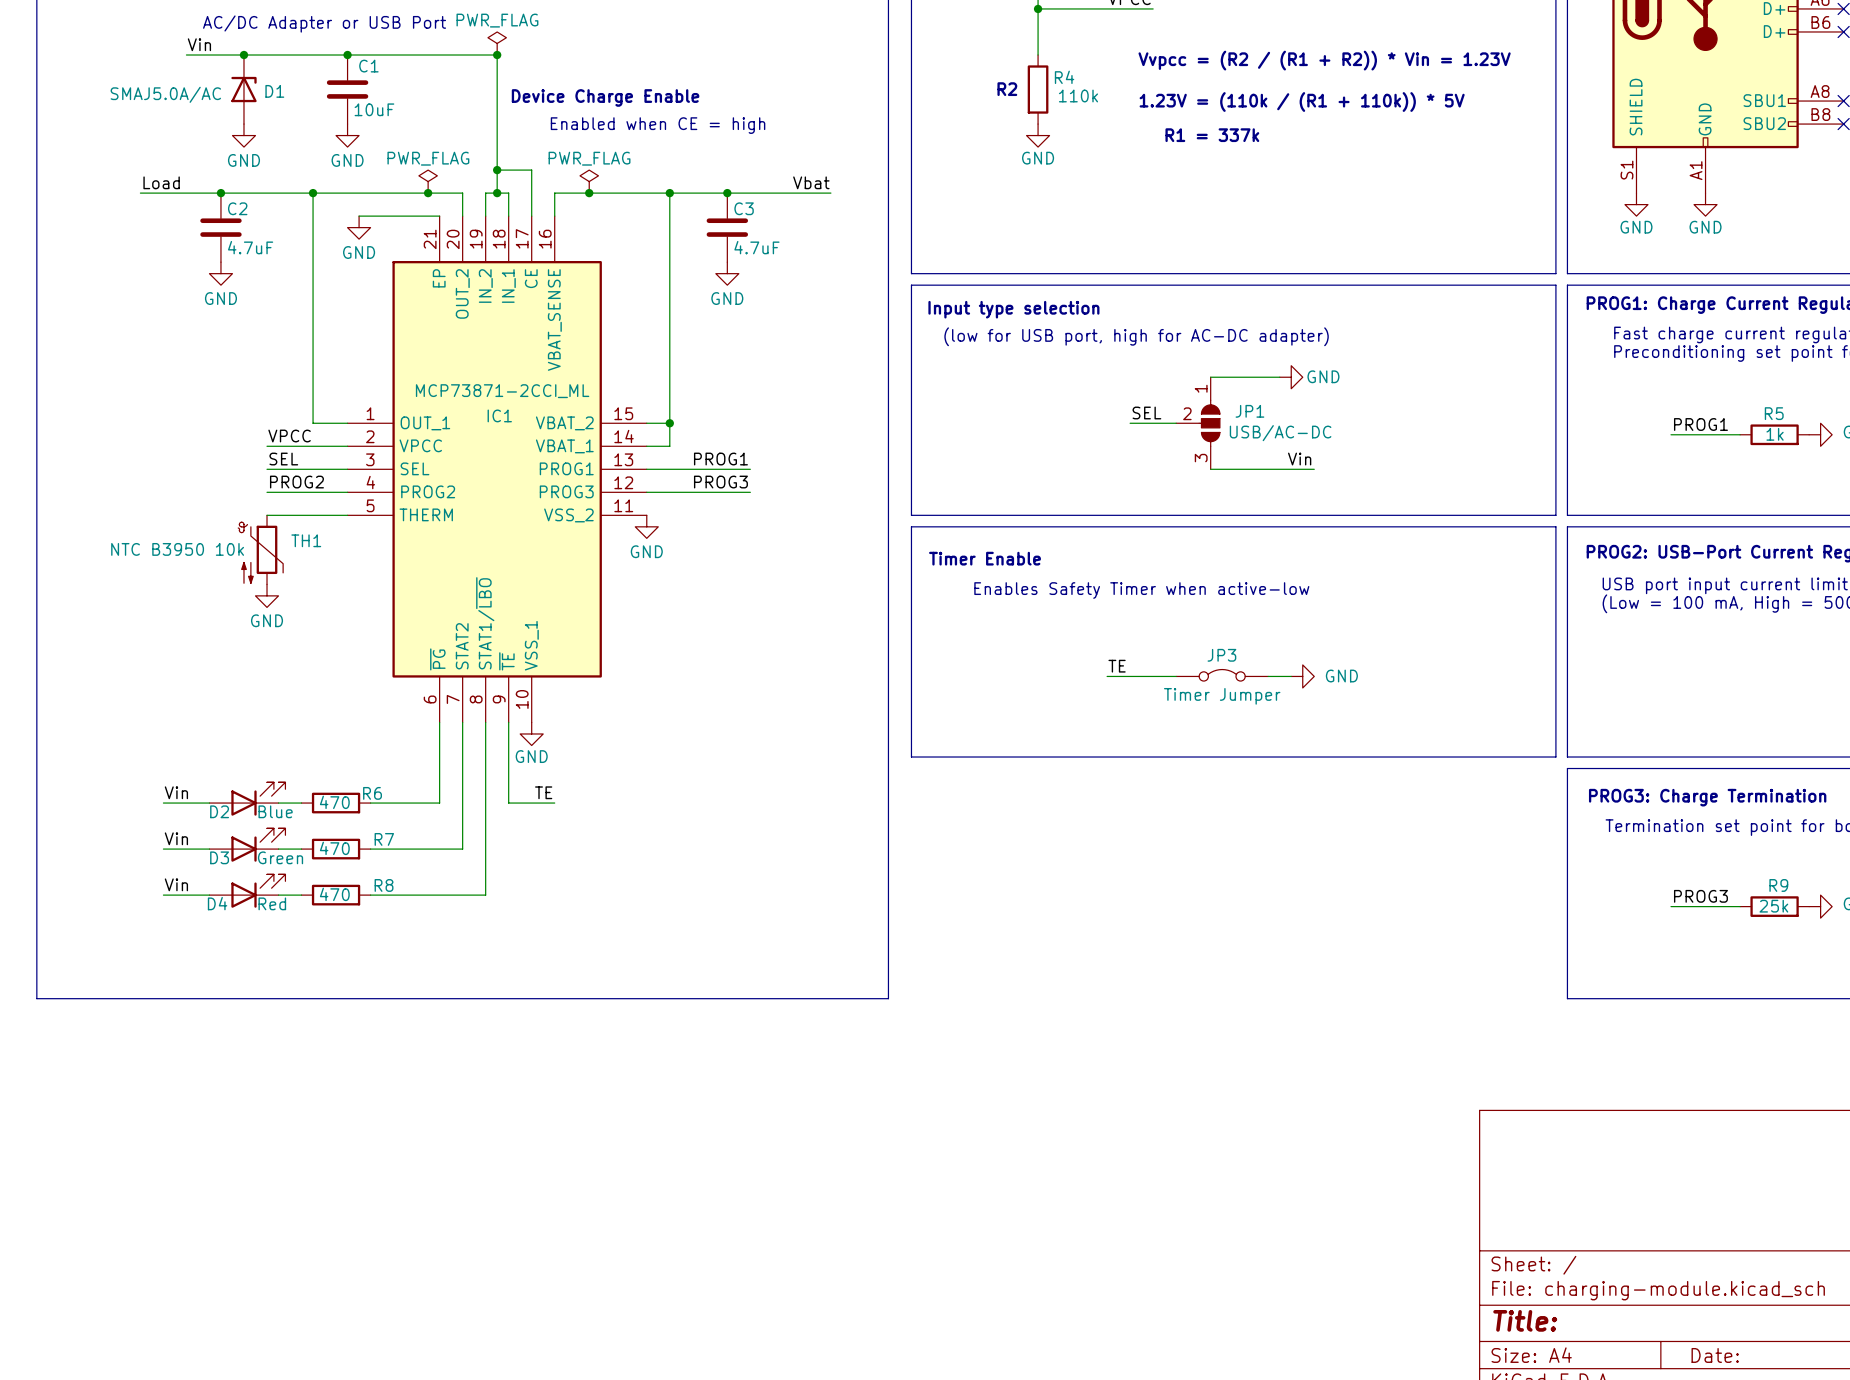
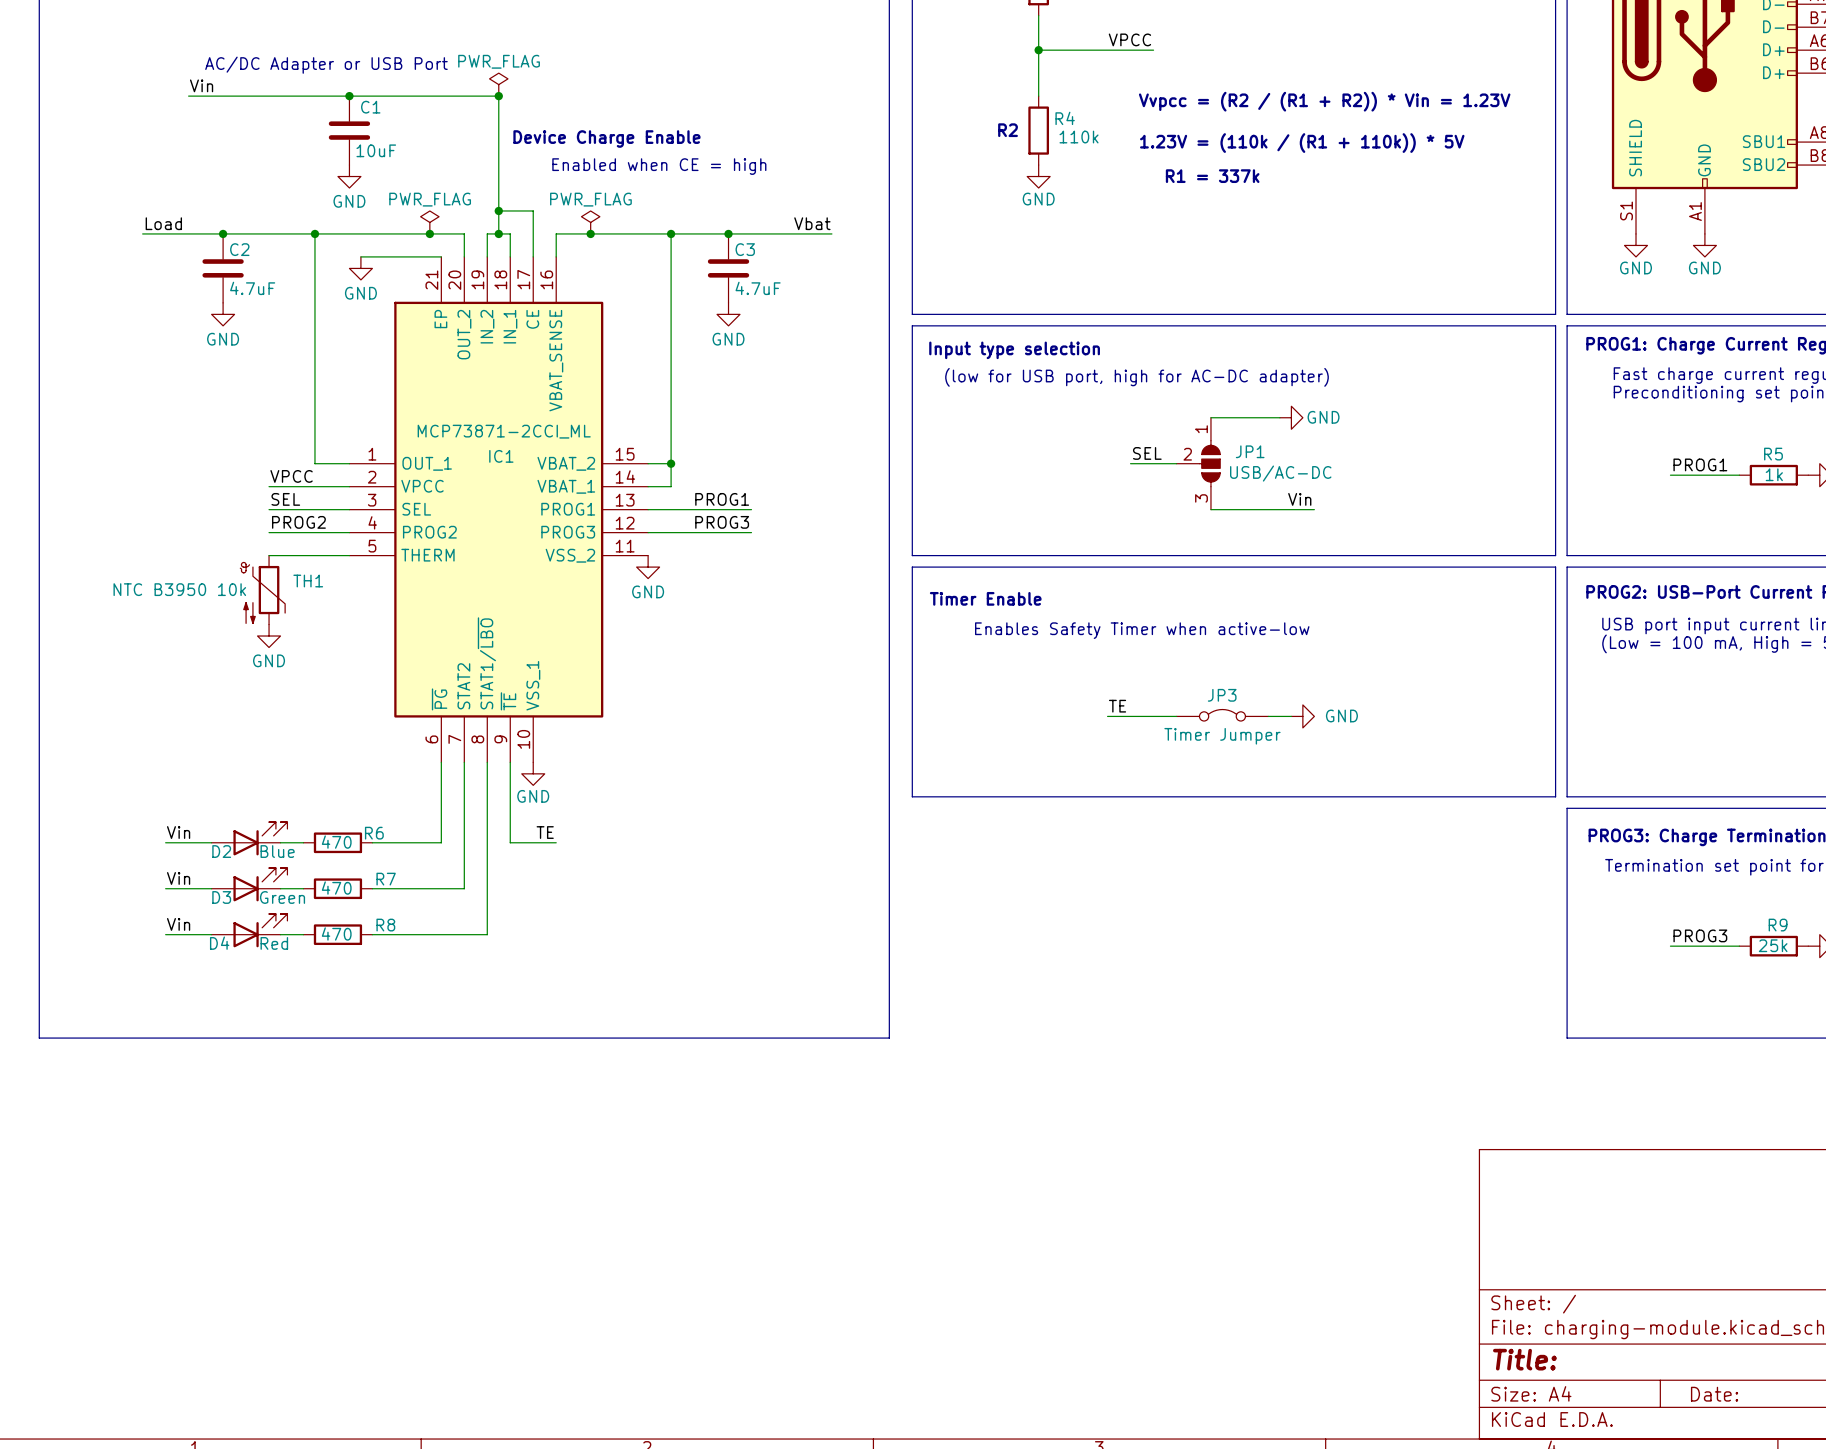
junction: (243, 55) -> none
D1: SMAJ5.0A/AC (243, 89) -> none
power symbol: GND (243, 135) -> none

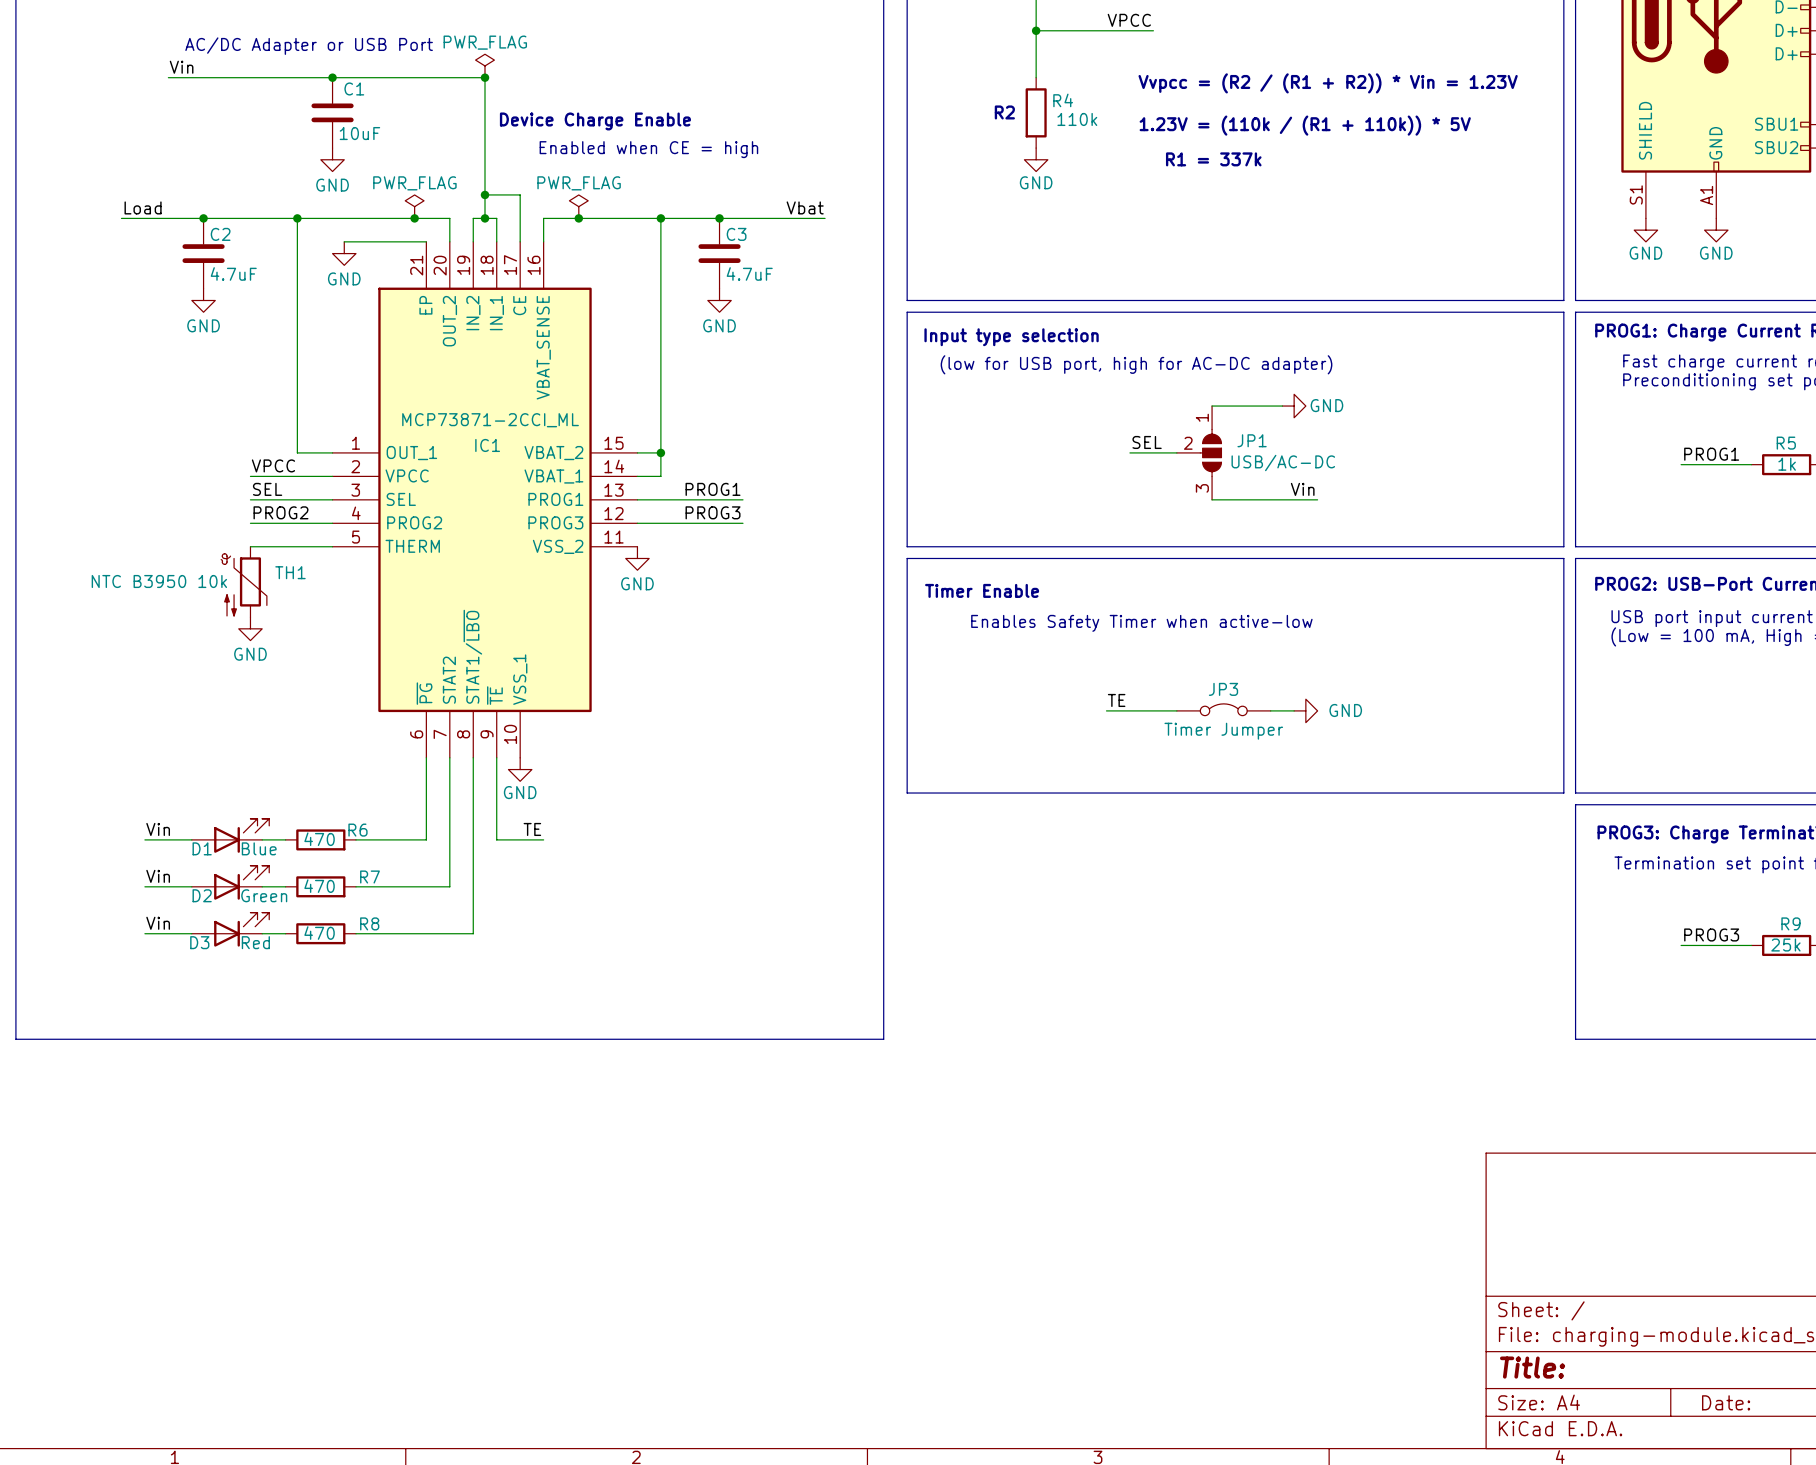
D2 name: D2 (221, 851) -> D1 (202, 848)
D3 name: D3 (221, 897) -> D2 (202, 895)
D4 name: D4 (219, 943) -> D3 (199, 942)

